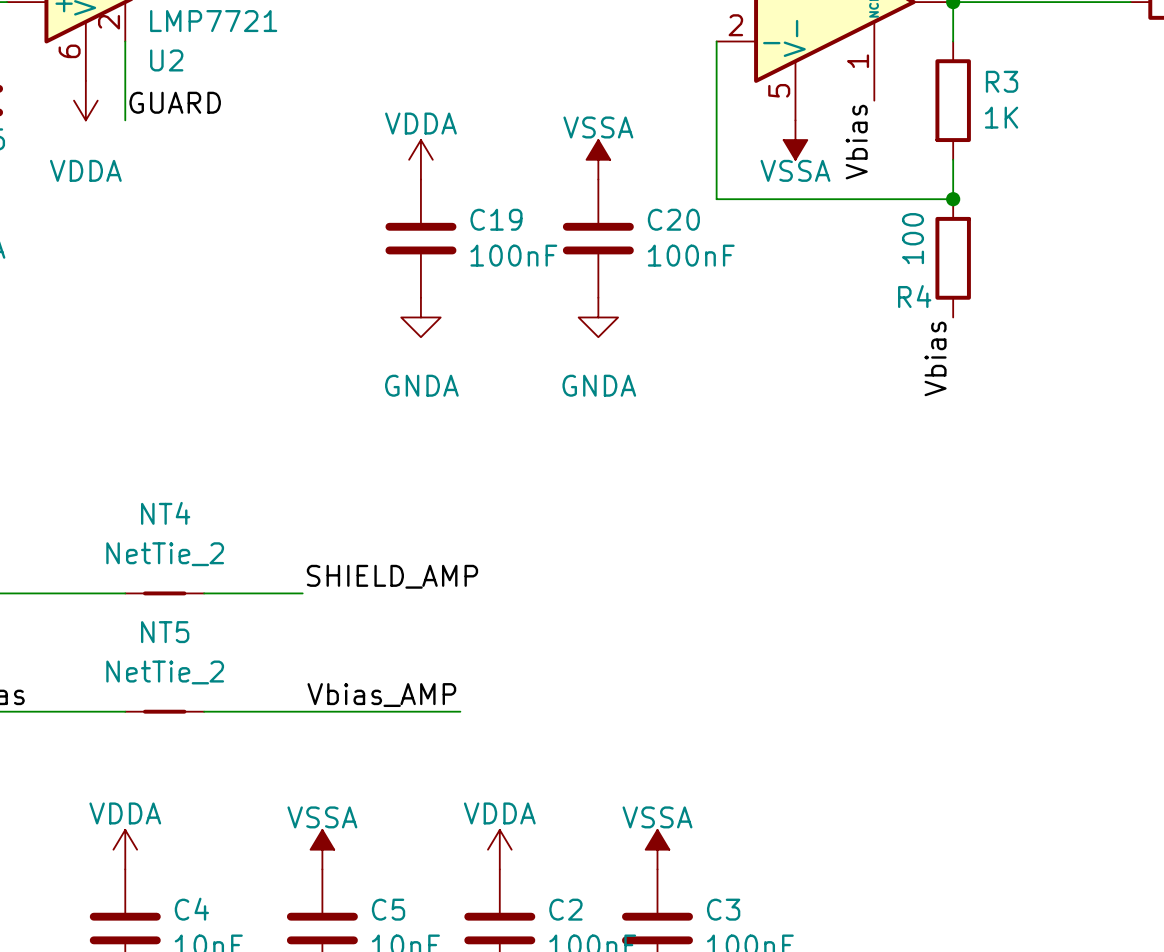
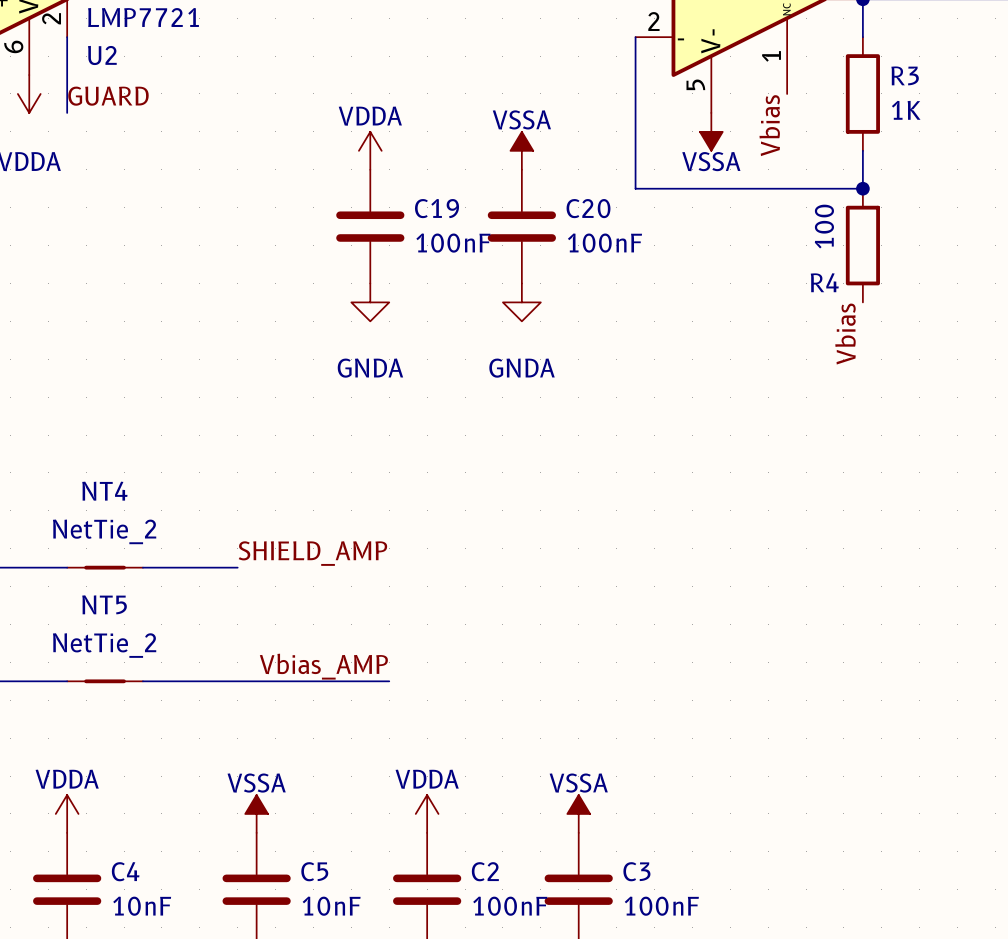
power symbol position: VDDA (420, 159) -> VDDA (370, 150)
C19 position: (420, 238) -> (370, 226)
power symbol position: GNDA (420, 317) -> GNDA (370, 302)

